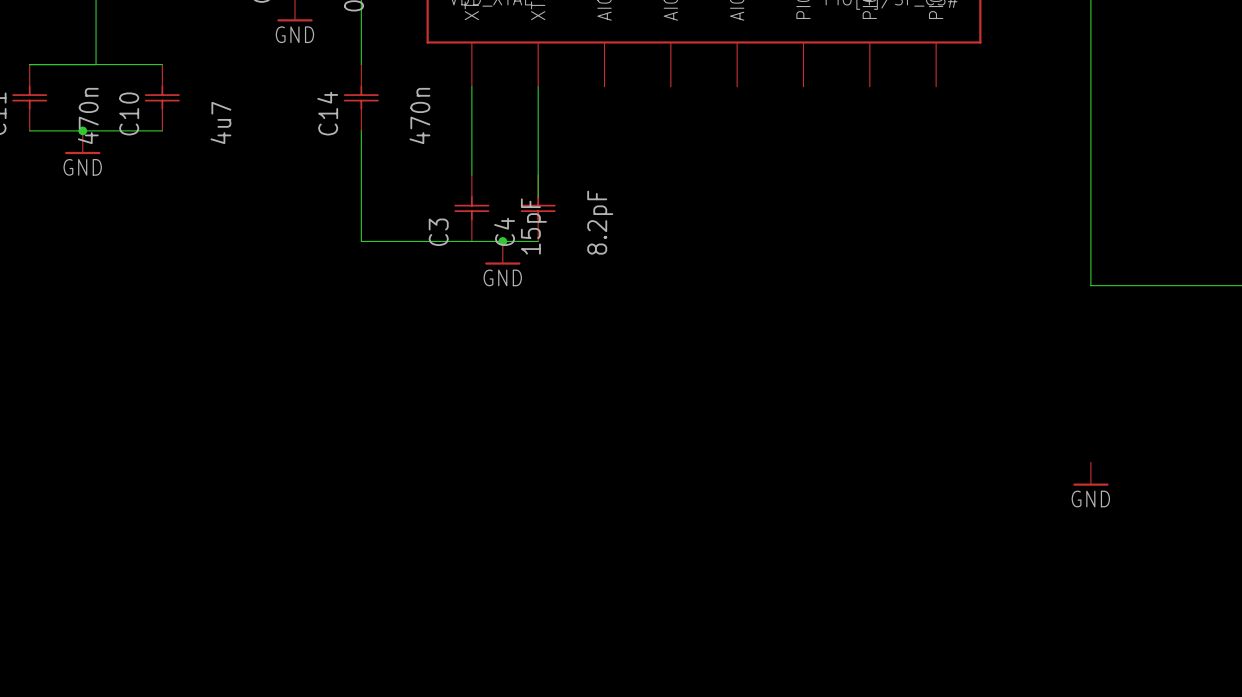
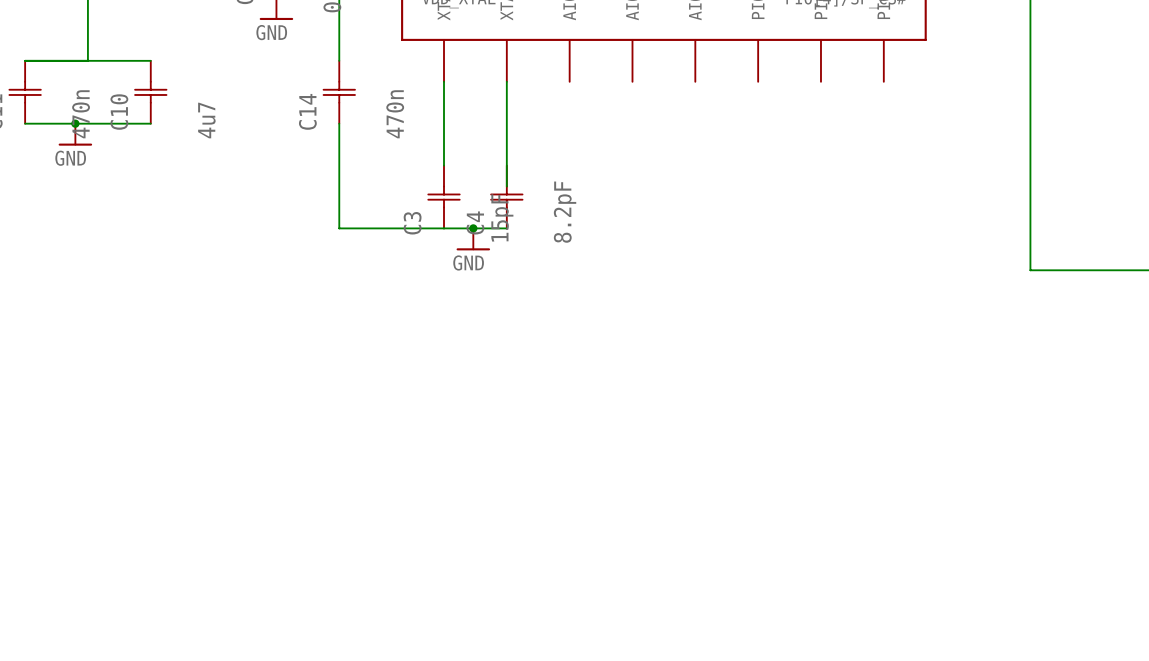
power symbol: GND (1090, 474) -> none

